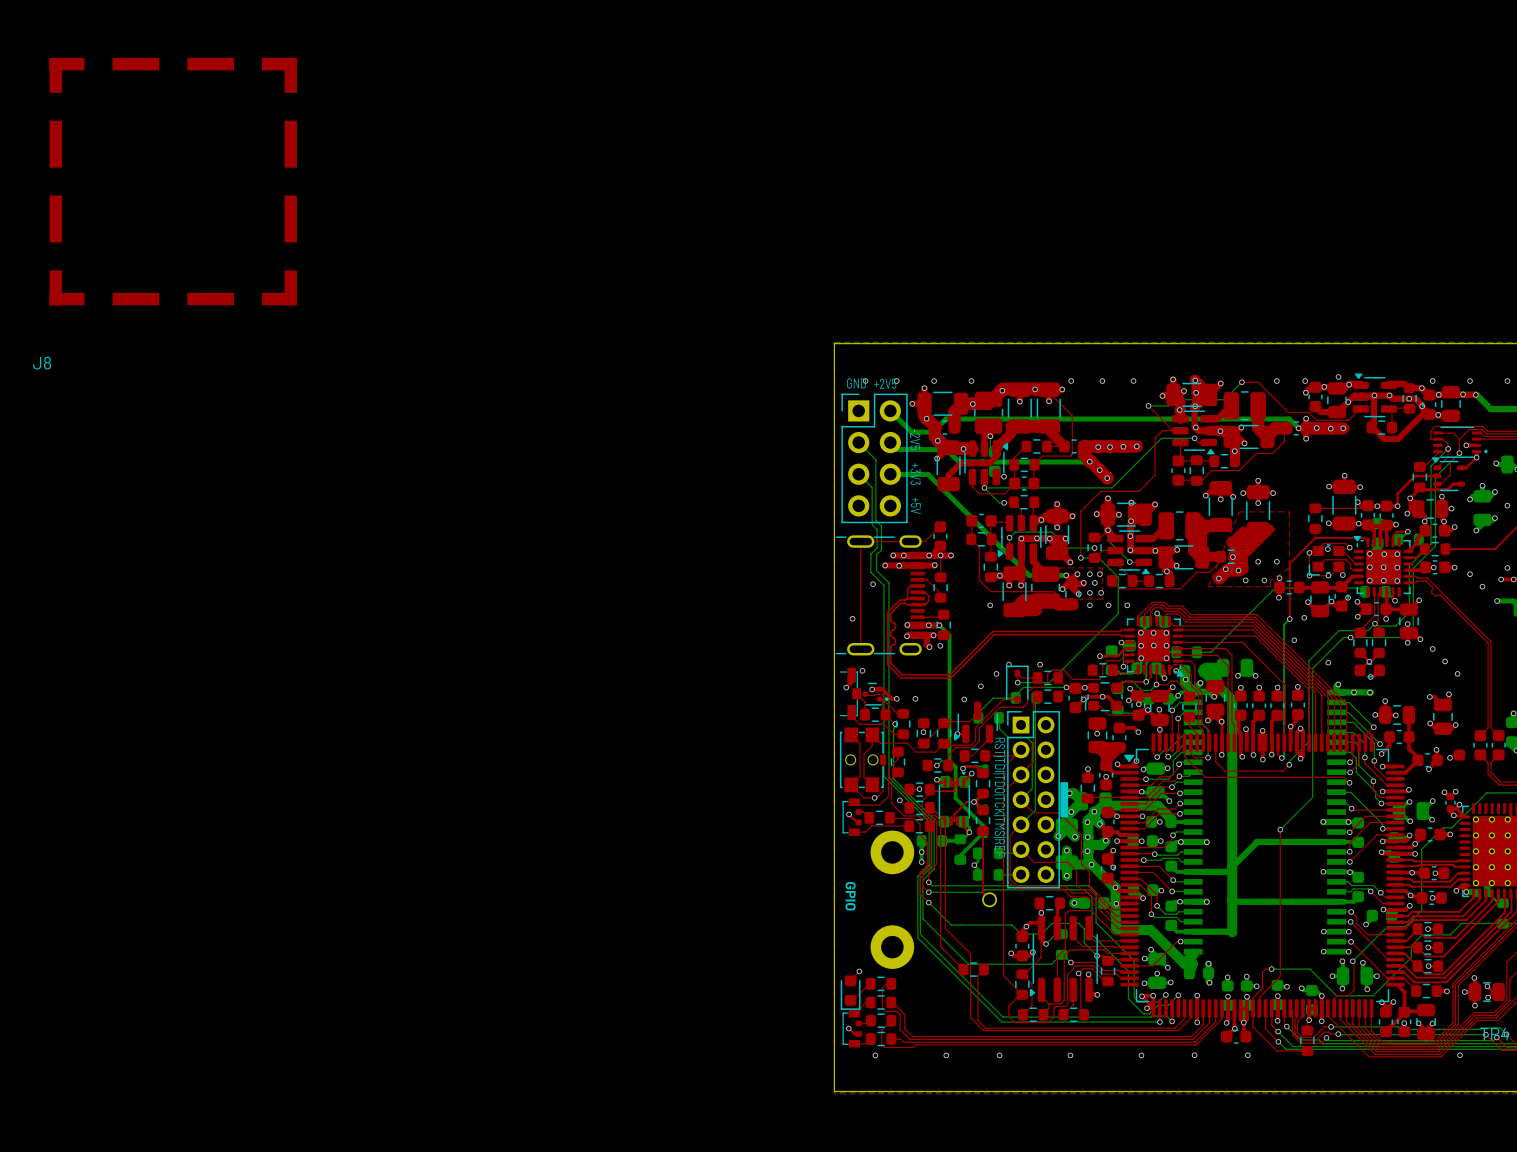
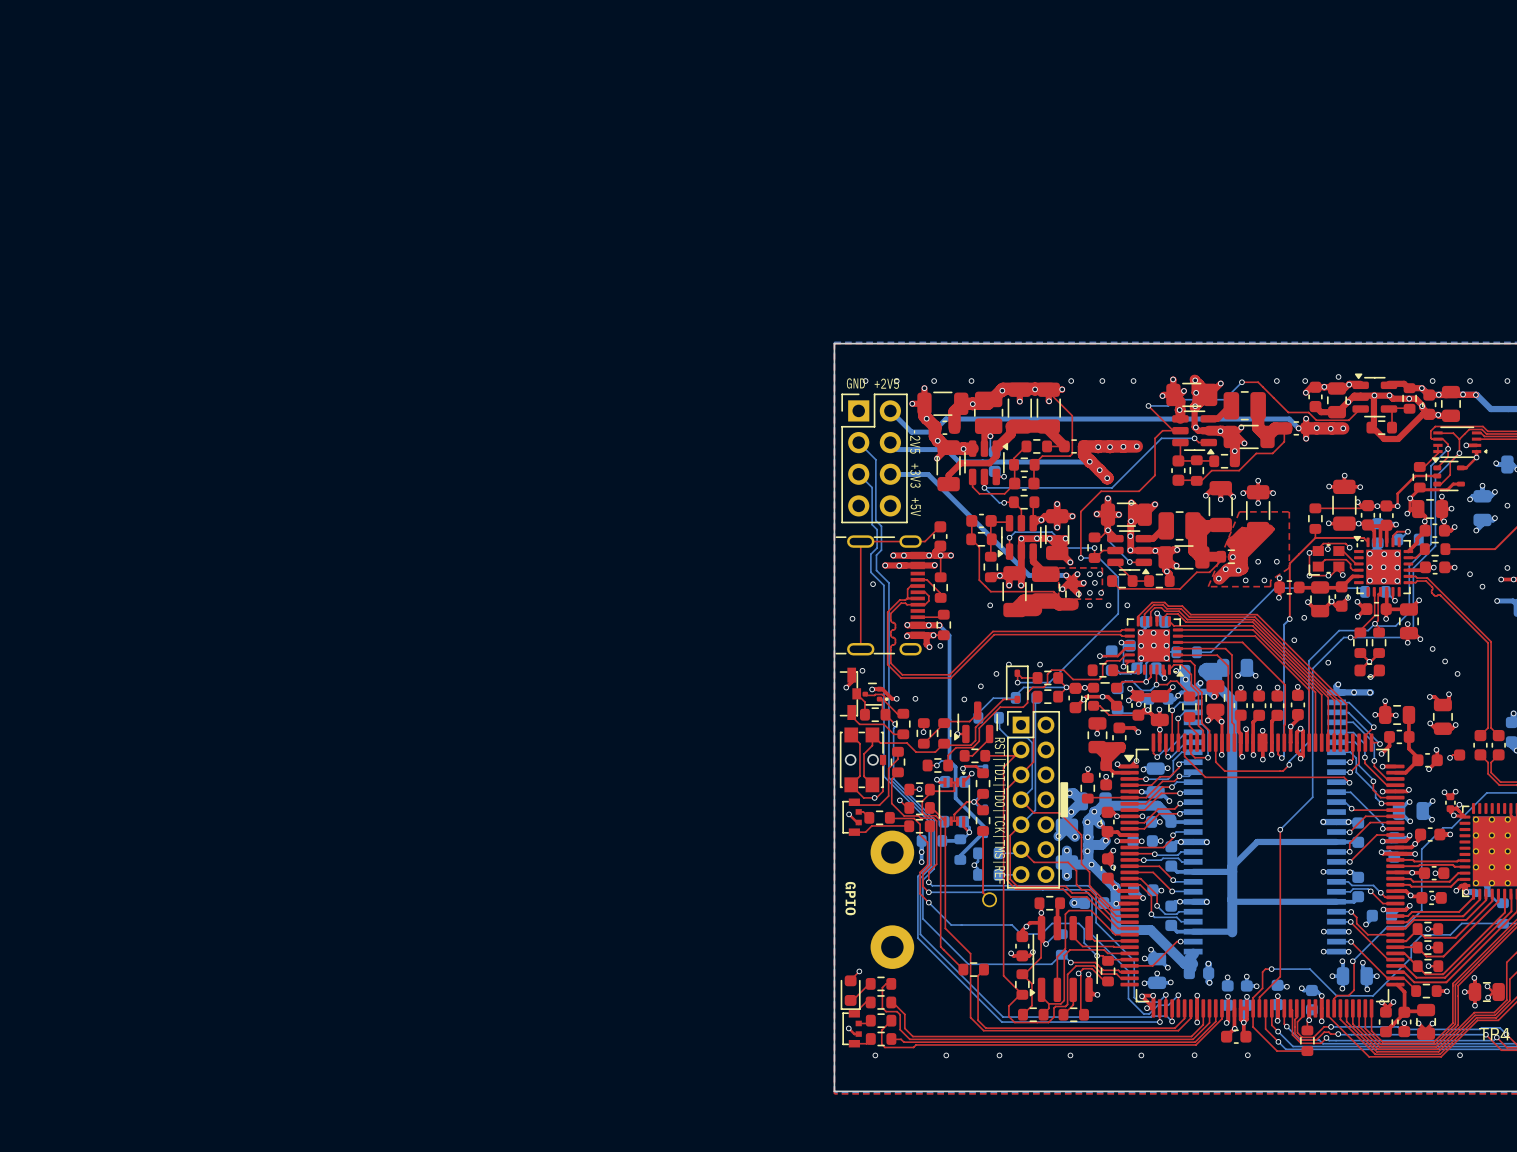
J8: (173, 181) -> none

